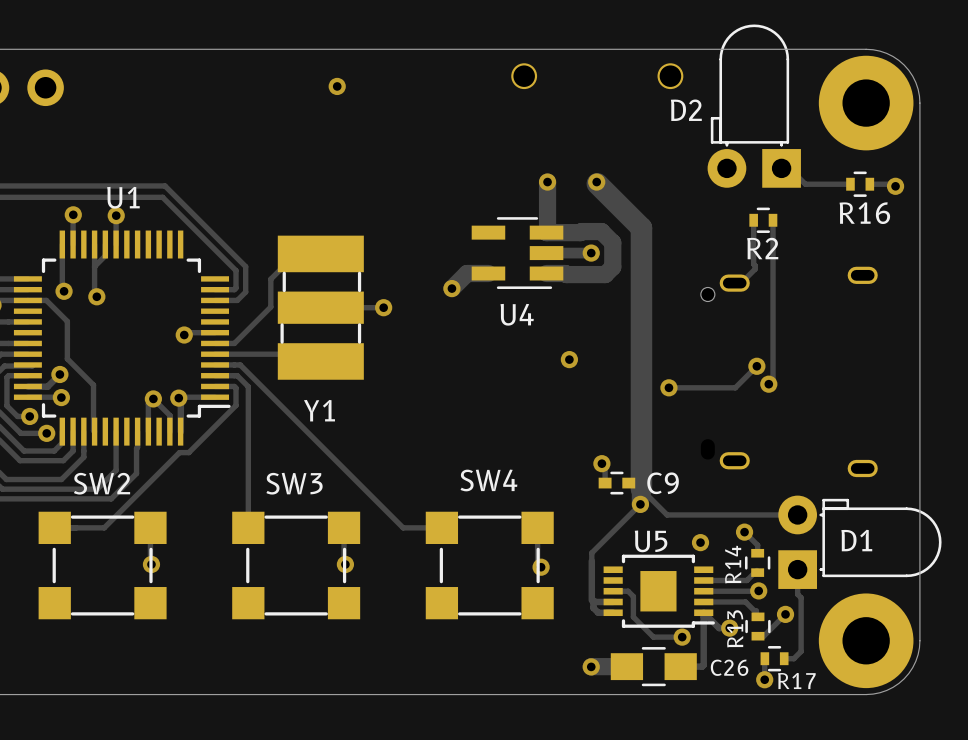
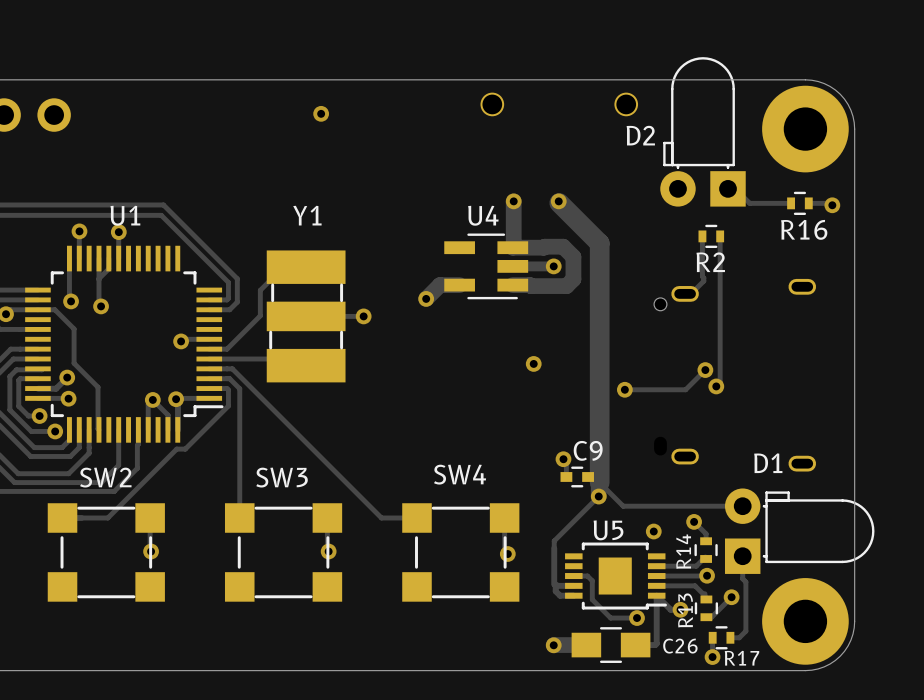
U4 name position: U4 (517, 314) -> U4 (483, 215)
Y1 name position: Y1 (319, 410) -> Y1 (307, 215)
C9 name position: C9 (663, 483) -> C9 (588, 450)
D1 name position: D1 (856, 540) -> D1 (768, 463)

